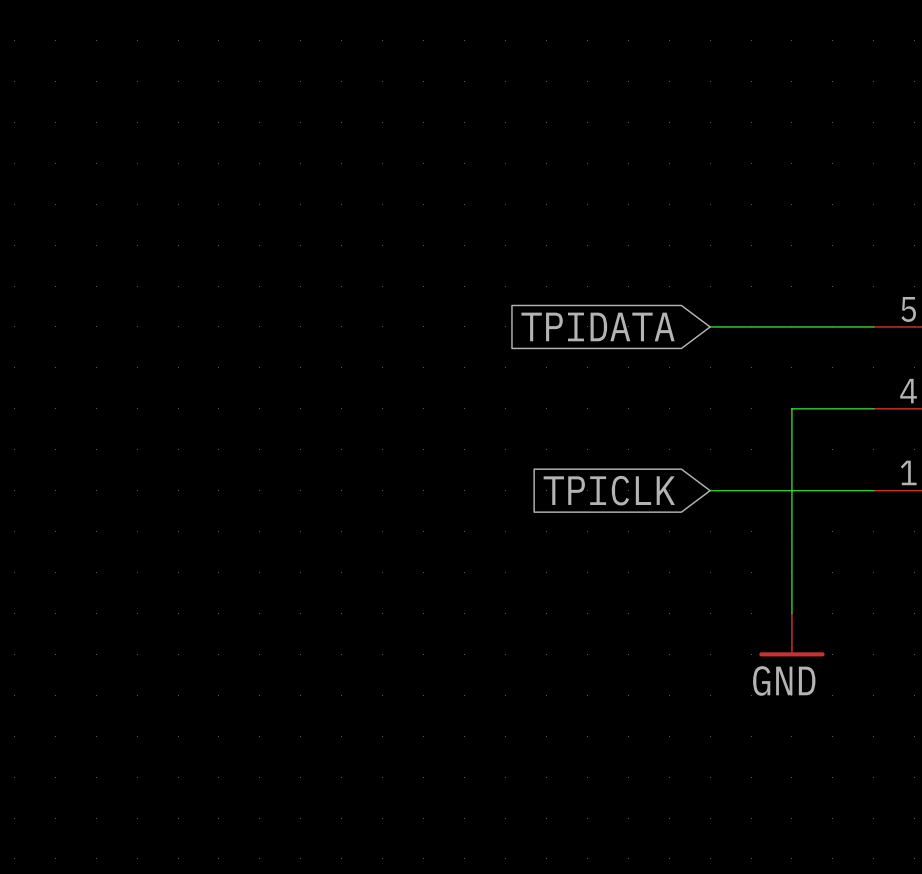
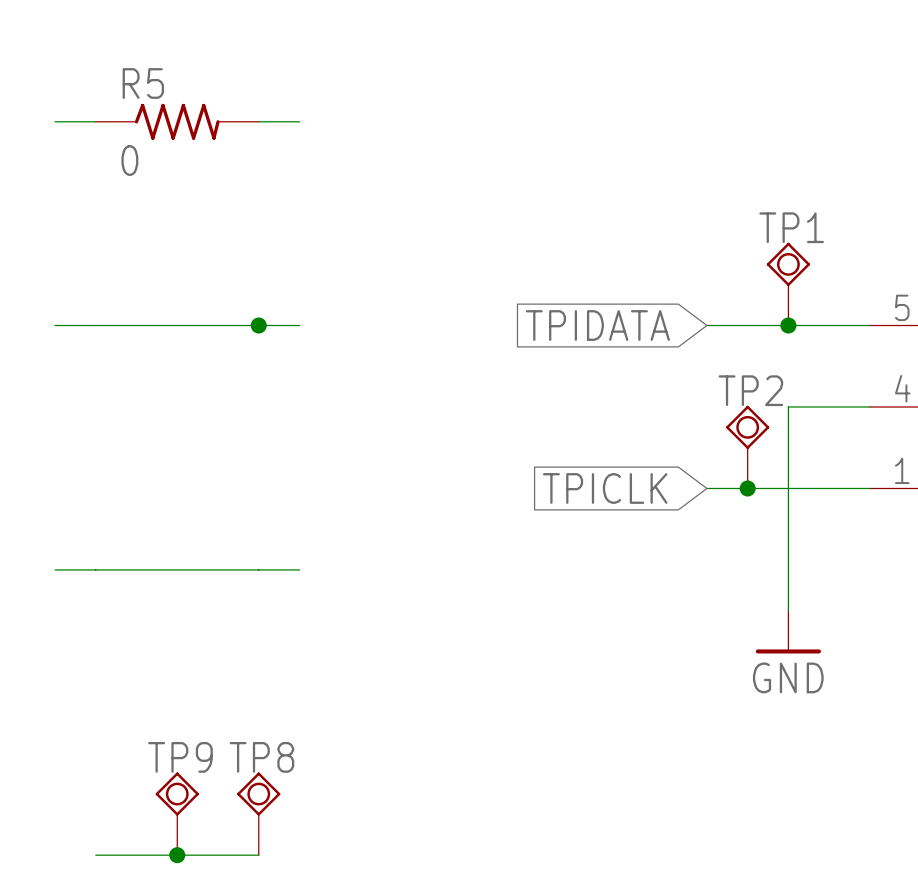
wire: none -> (55, 121) (95, 121)
R5: none -> 0 (177, 121)
wire: none -> (258, 121) (299, 121)
TP1: none -> (788, 284)
wire: none -> (55, 325) (299, 325)
junction: none -> (258, 325)
junction: none -> (788, 325)
TP2: none -> (747, 447)
junction: none -> (747, 488)
wire: none -> (55, 569) (299, 569)
TP9: none -> (177, 813)
TP8: none -> (258, 813)
wire: none -> (95, 855) (258, 855)
junction: none -> (177, 855)

